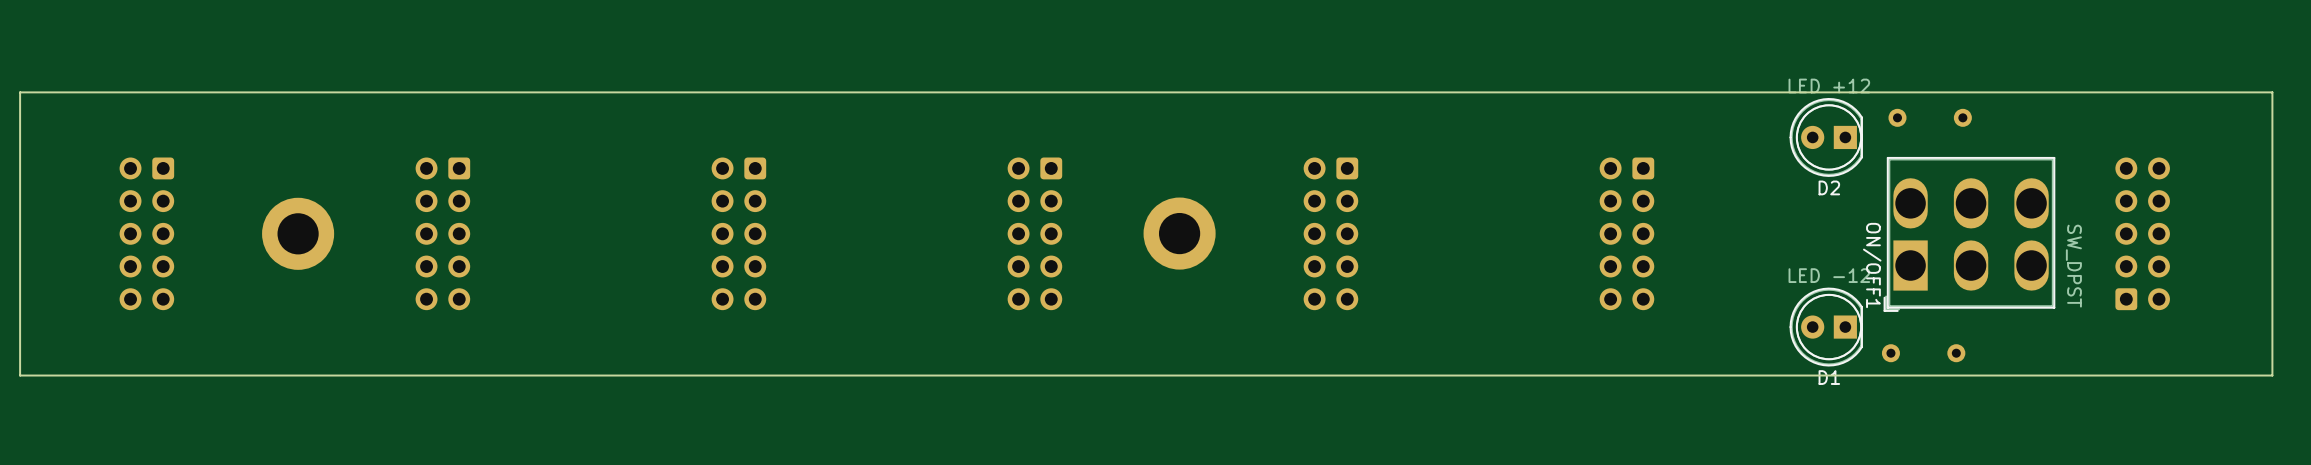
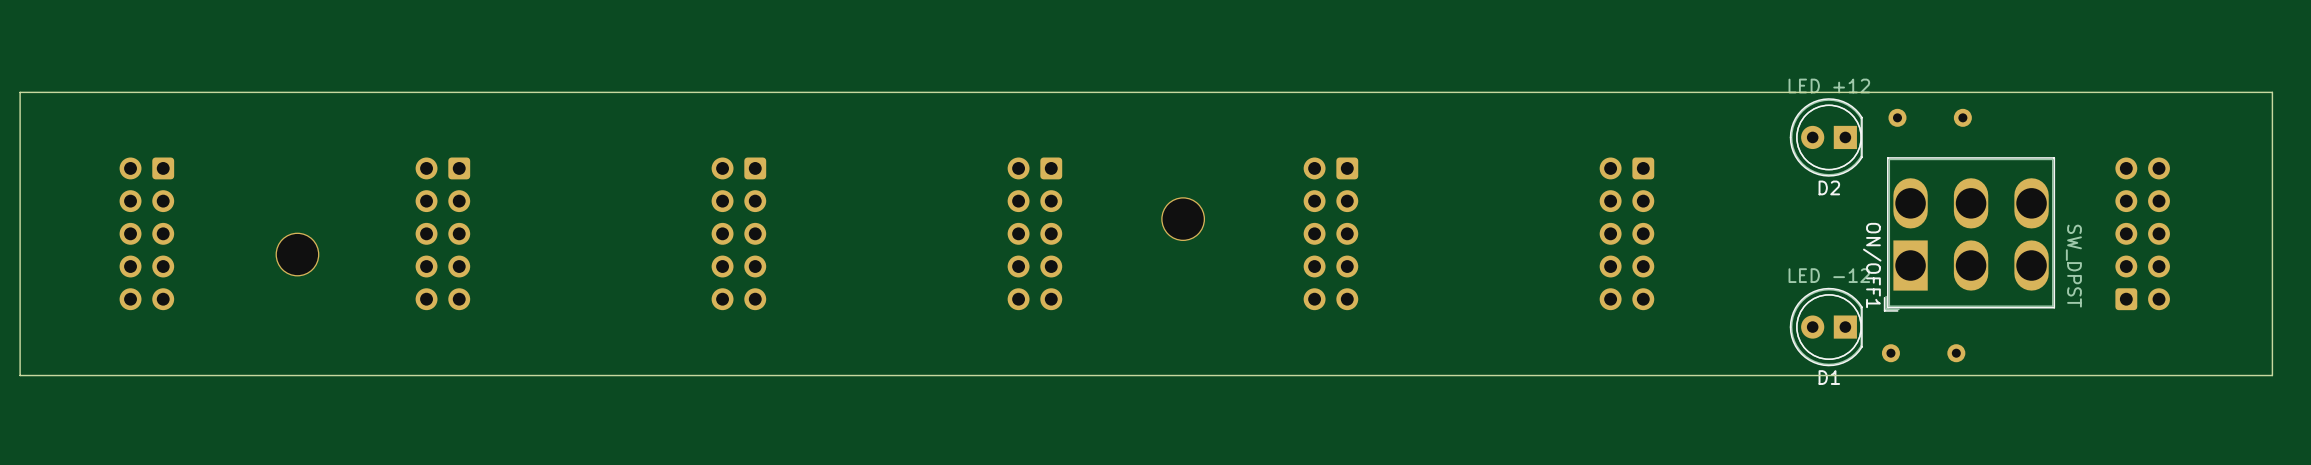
part: none -> (1183, 219)
part: (298, 233) -> none
part: (1179, 233) -> none
part: none -> (297, 254)

